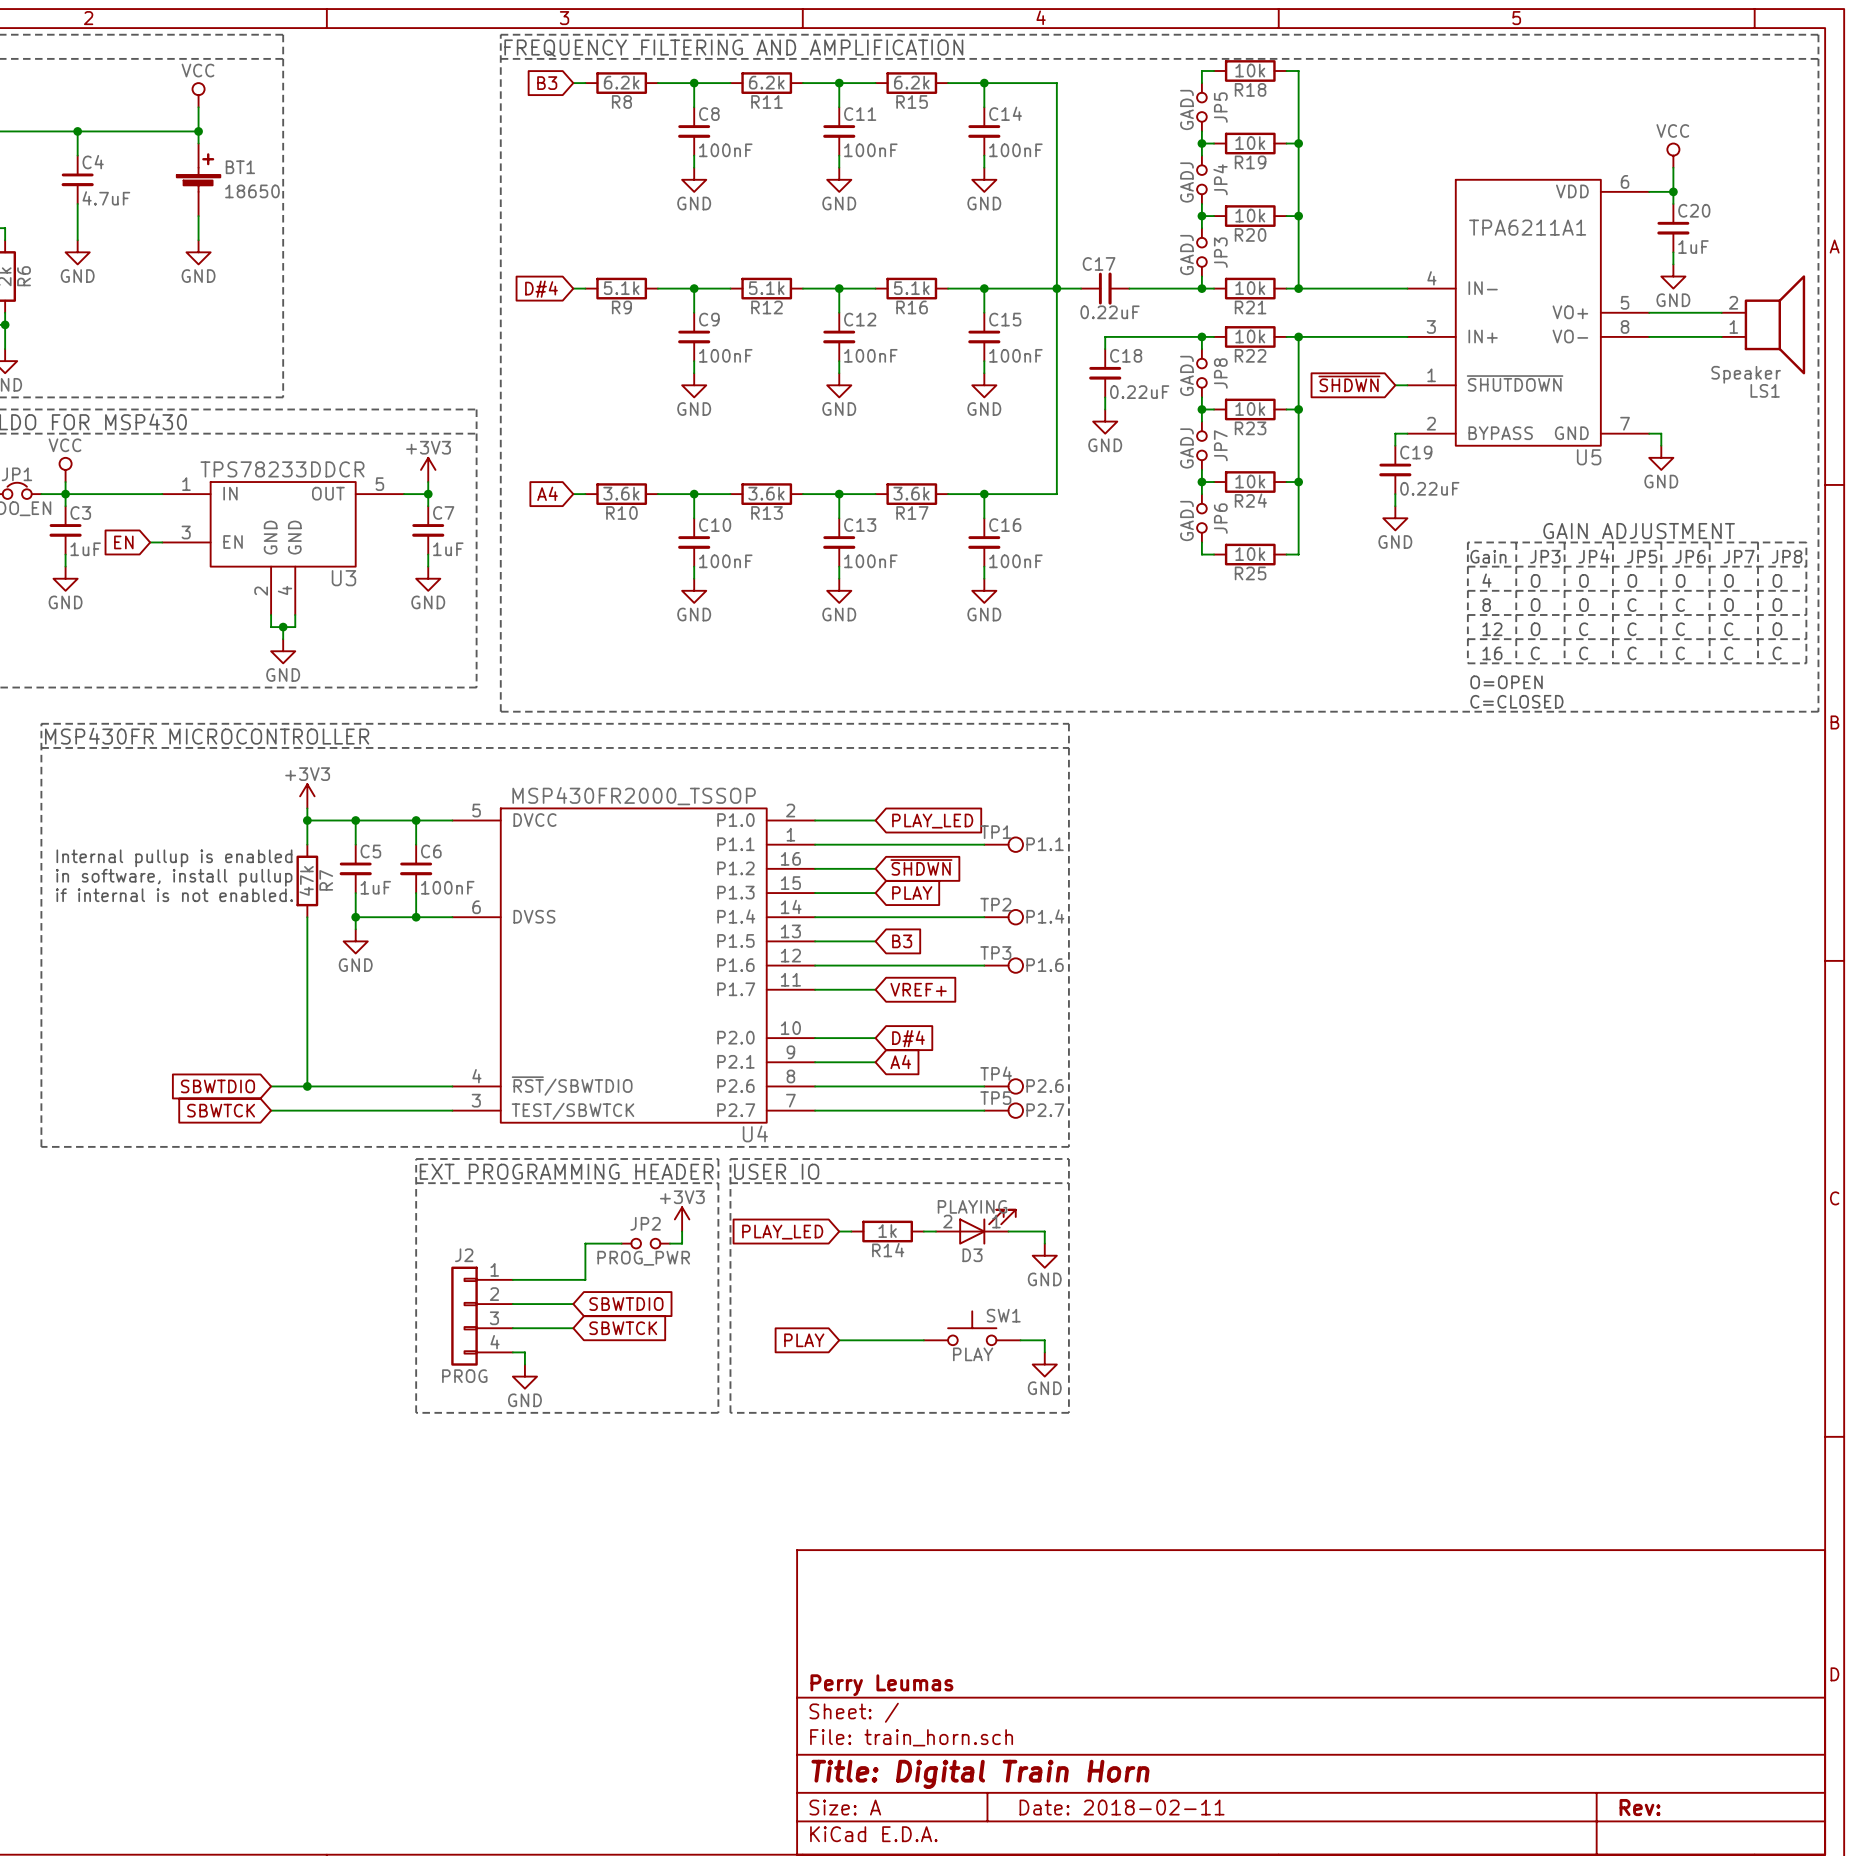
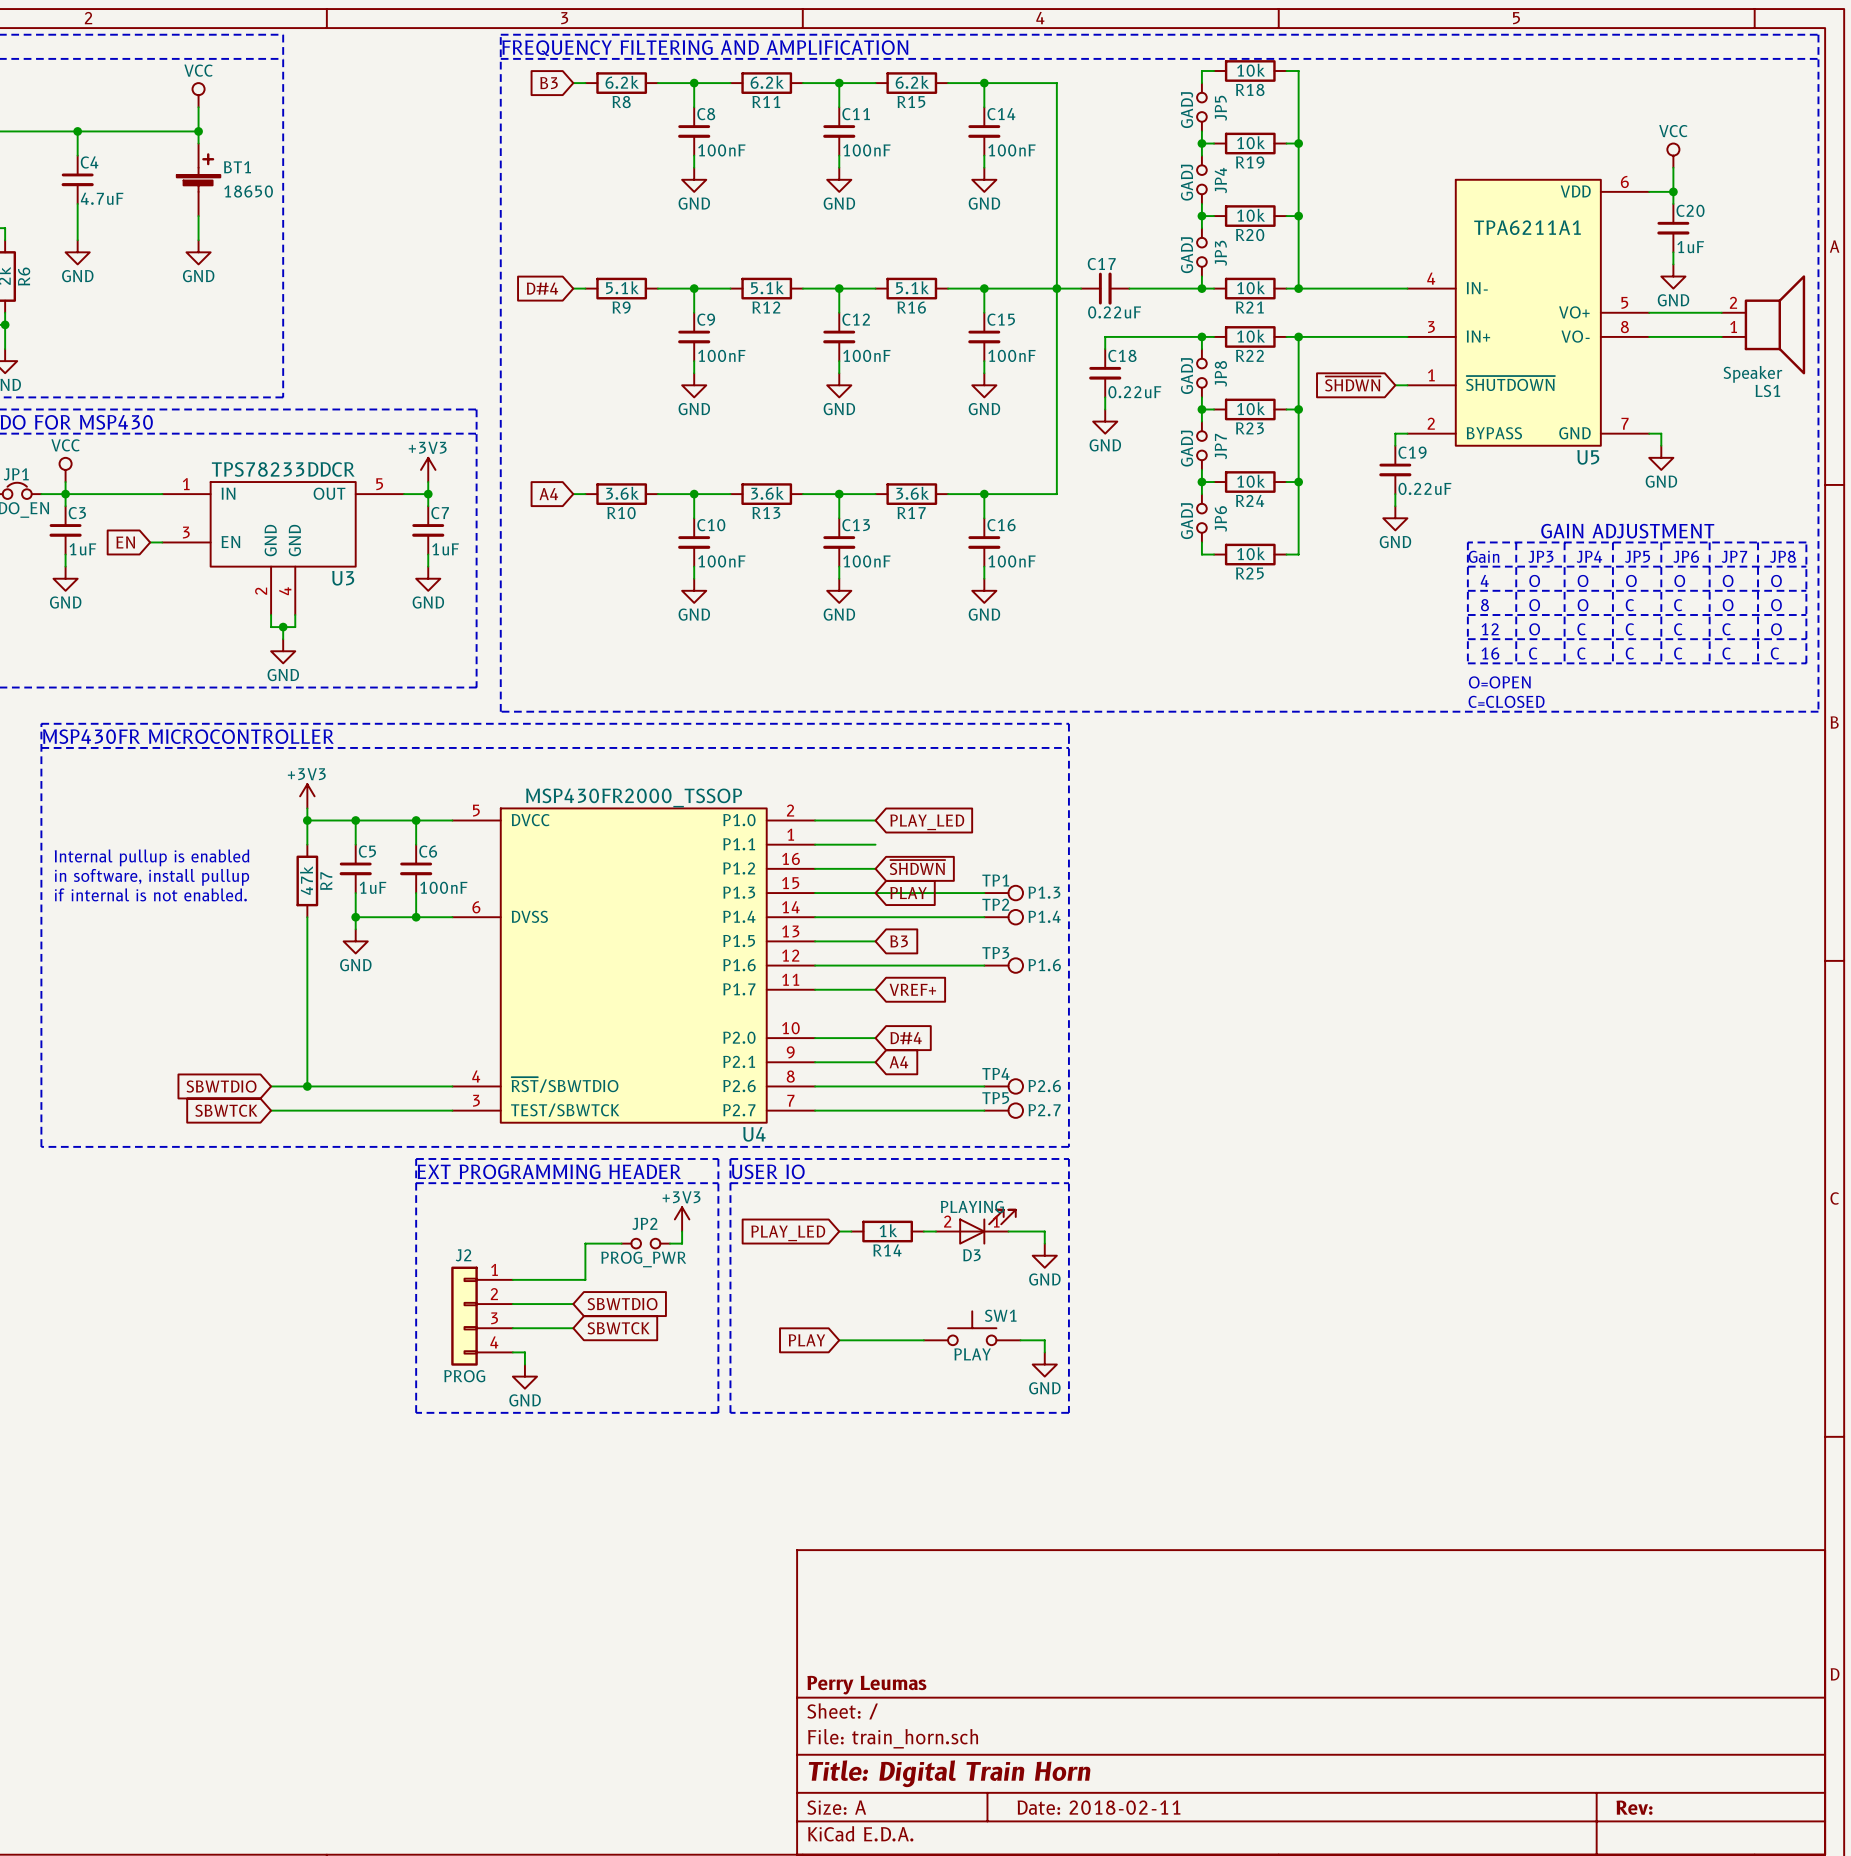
wire: (875, 844) (984, 844) -> (875, 893) (984, 893)
TP1 position: (1003, 844) -> (1003, 893)
TP1 value: P1.1 (1045, 844) -> P1.3 (1044, 892)

